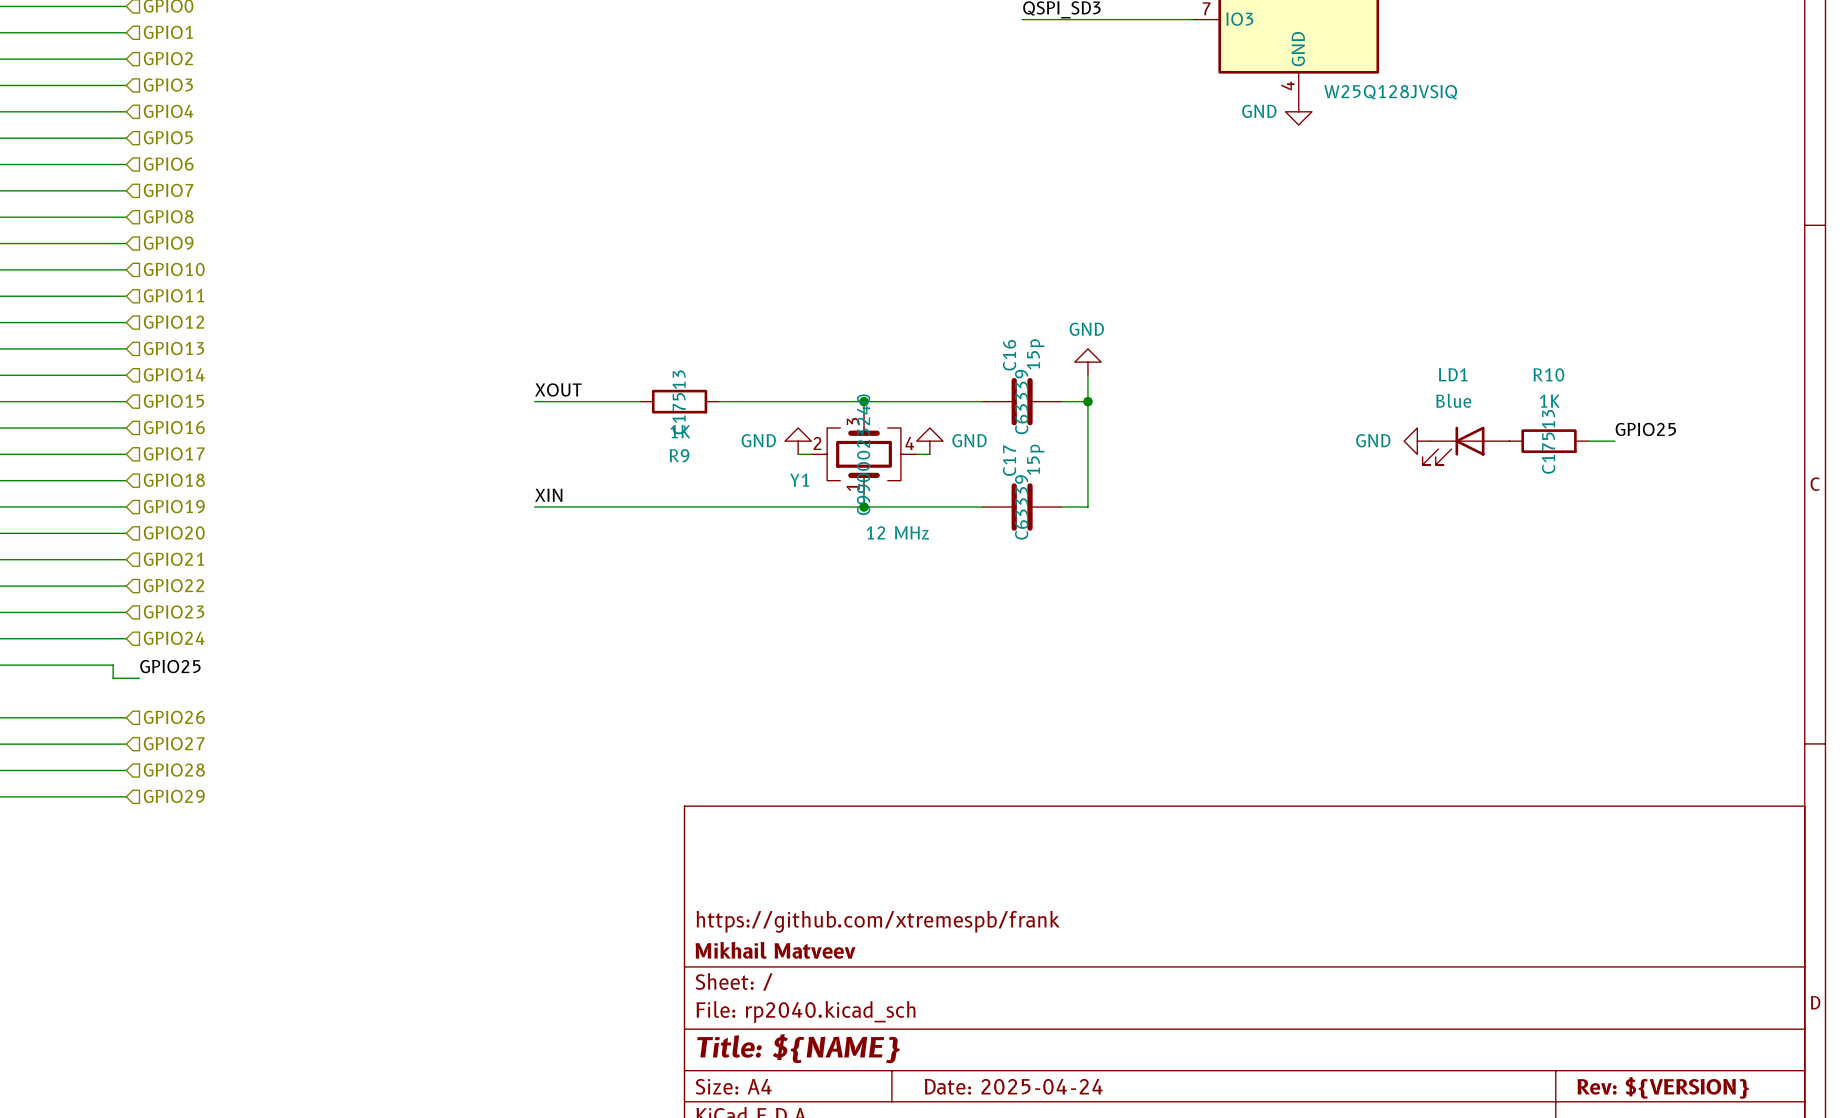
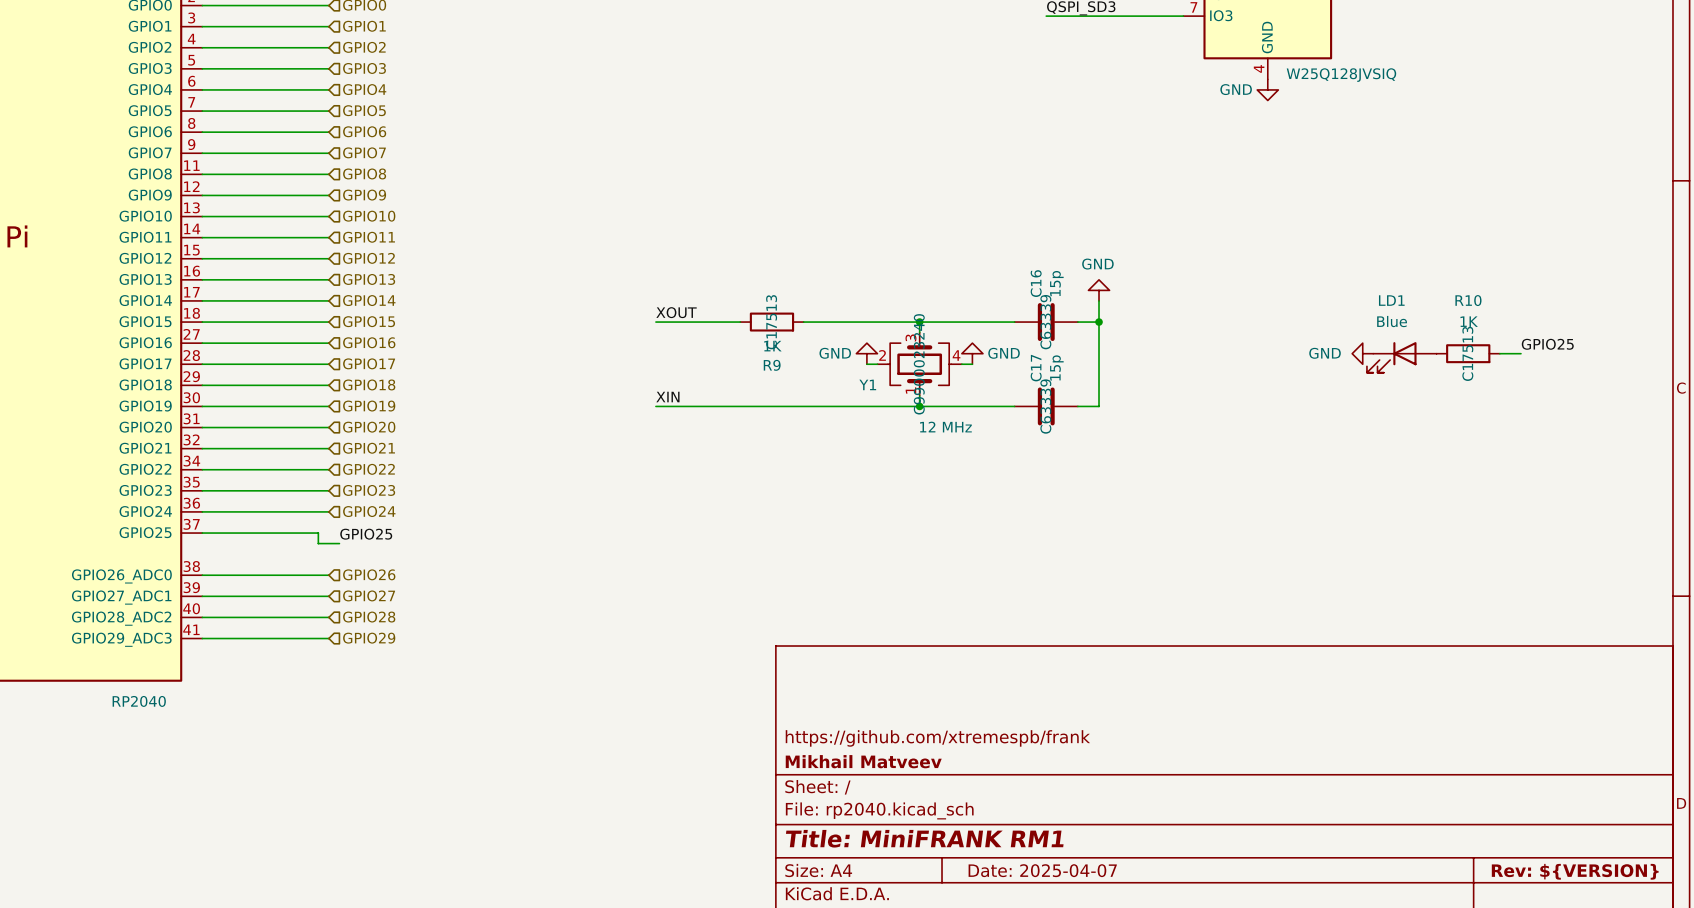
title block: Title: ${NAME} (798, 1048) -> Title: MiniFRANK RM1 (924, 838)
title block: Date: 2025-04-24 (1013, 1086) -> Date: 2025-04-07 (1042, 870)

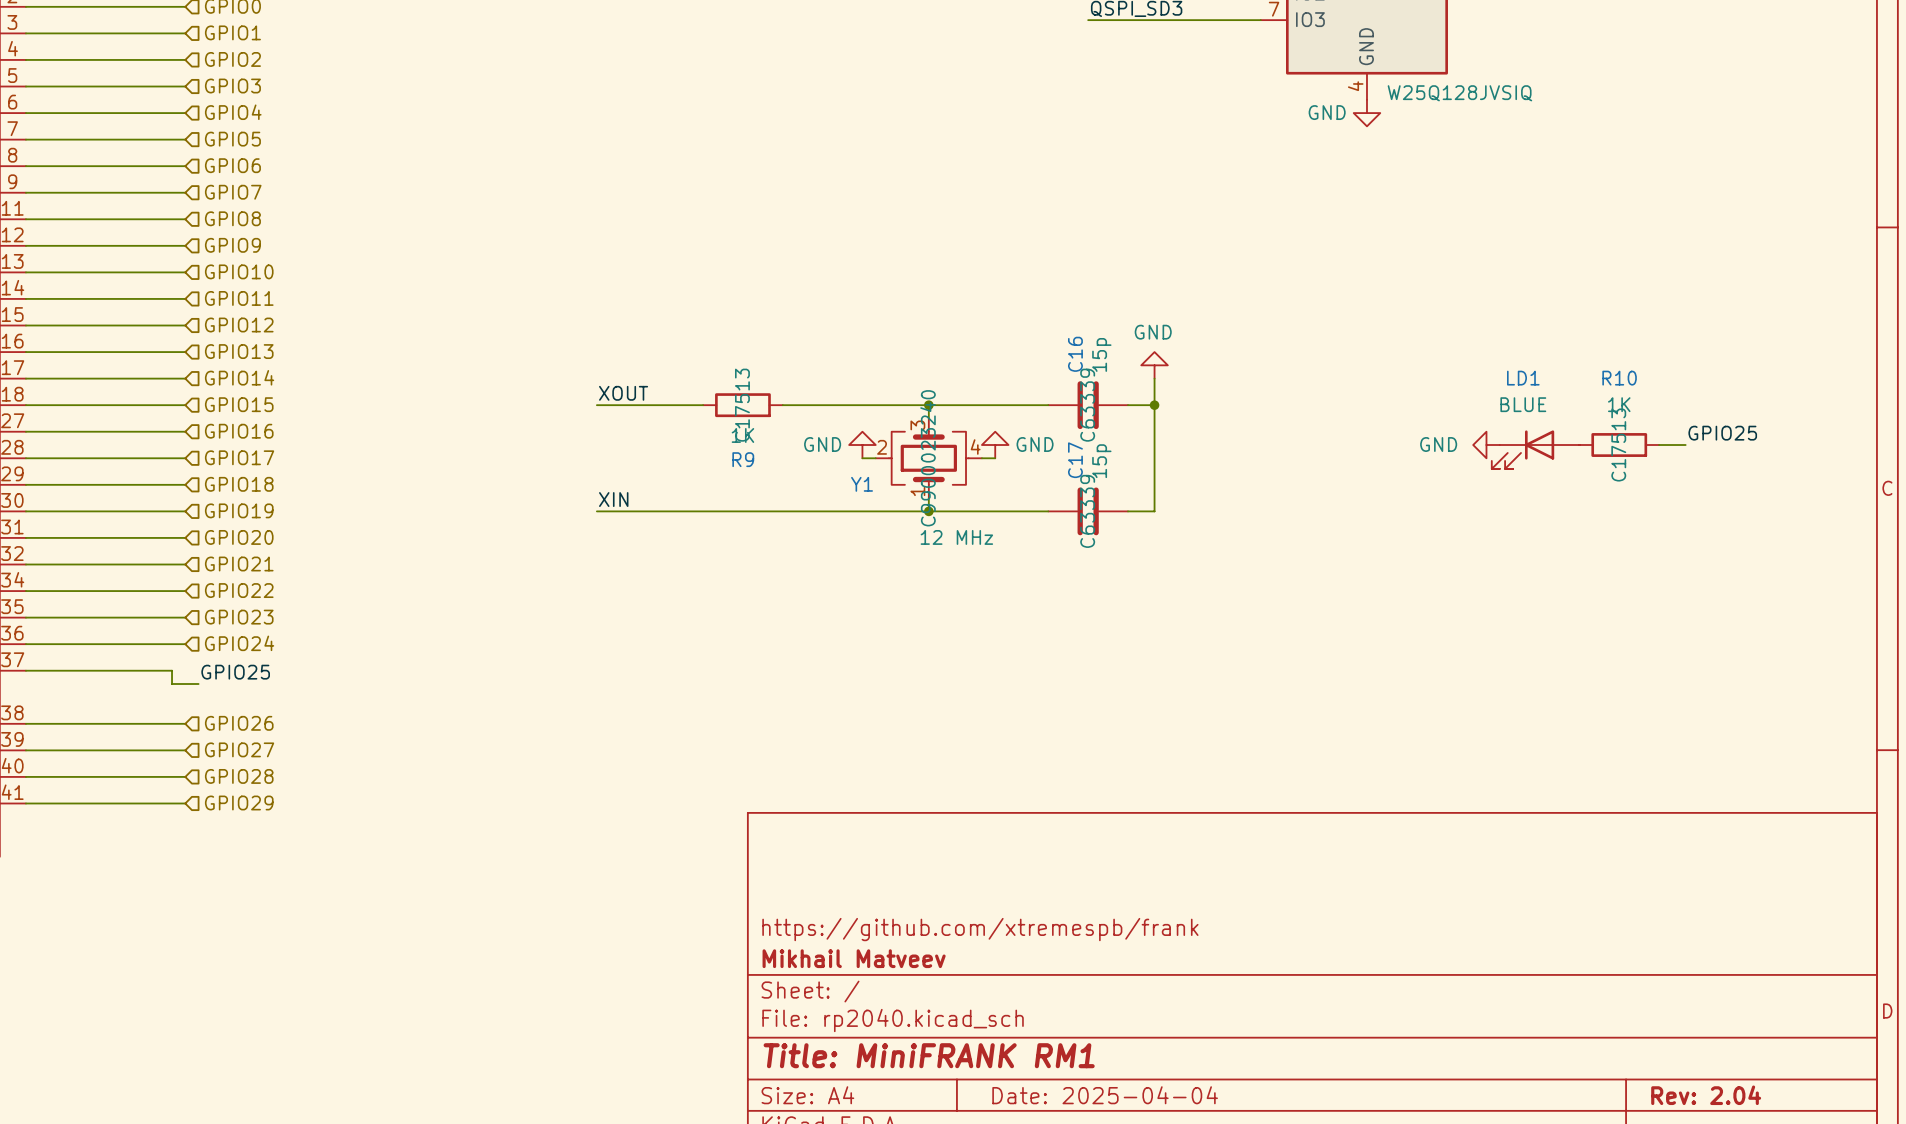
LD1 value: Blue (1392, 321) -> BLUE (1523, 404)
title block: Date: 2025-04-07 (1042, 870) -> Date: 2025-04-04 (1105, 1095)
title block: Rev: ${VERSION} (1575, 871) -> Rev: 2.04 (1706, 1095)

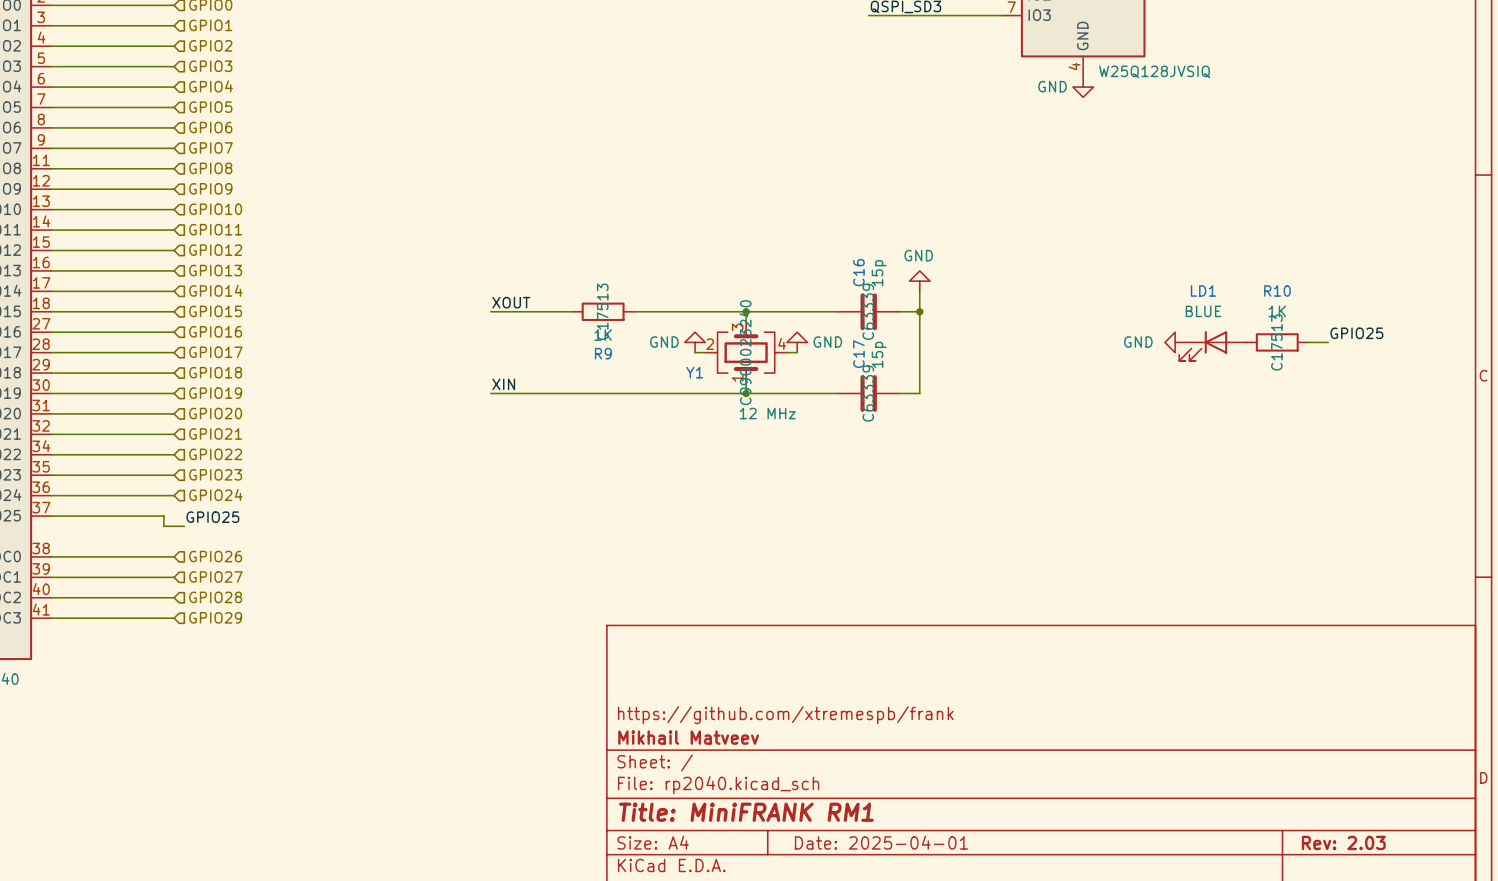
title block: Date: 2025-04-04 (1105, 1095) -> Date: 2025-04-01 (881, 842)
title block: Rev: 2.04 (1706, 1095) -> Rev: 2.03 (1343, 842)

